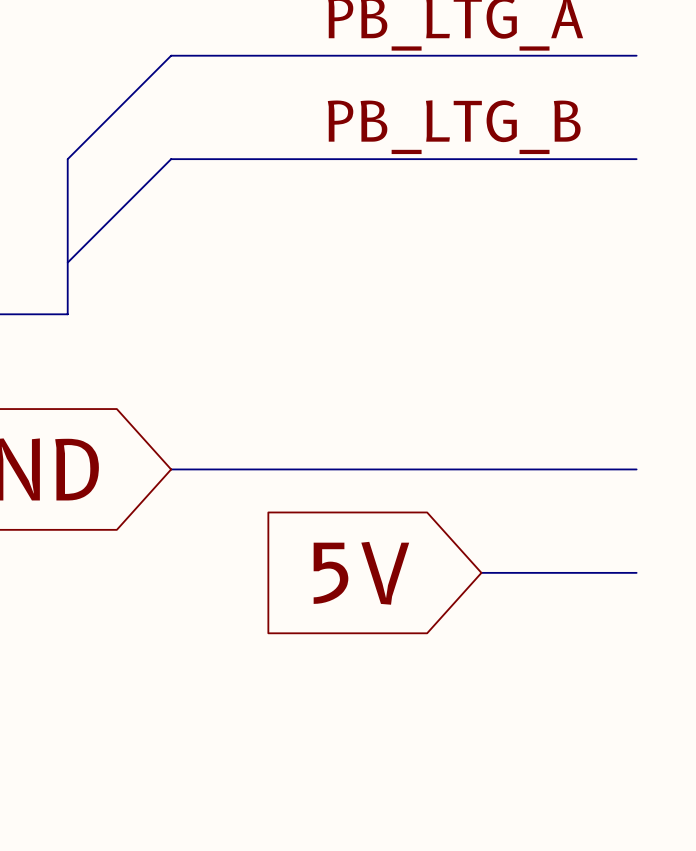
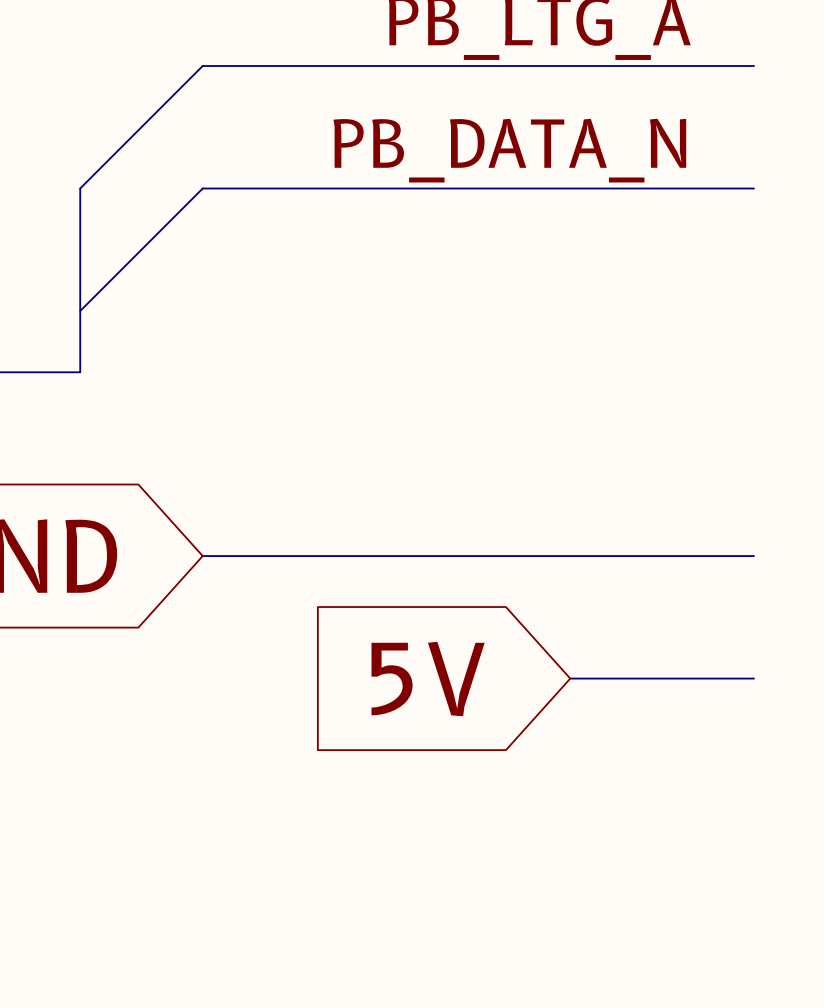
label: PB_LTG_B (454, 127) -> PB_DATA_N (509, 150)

